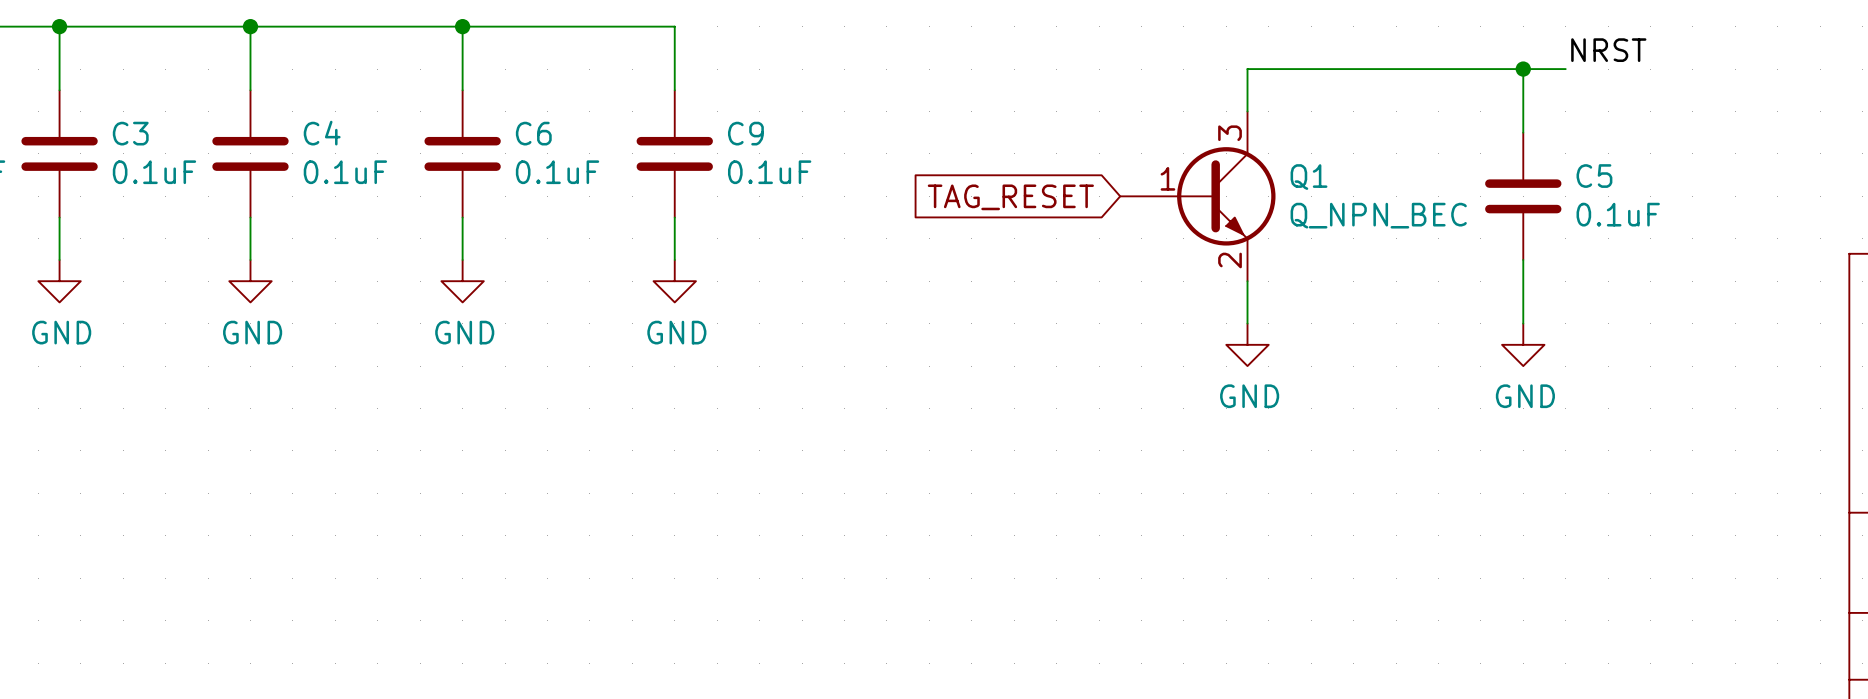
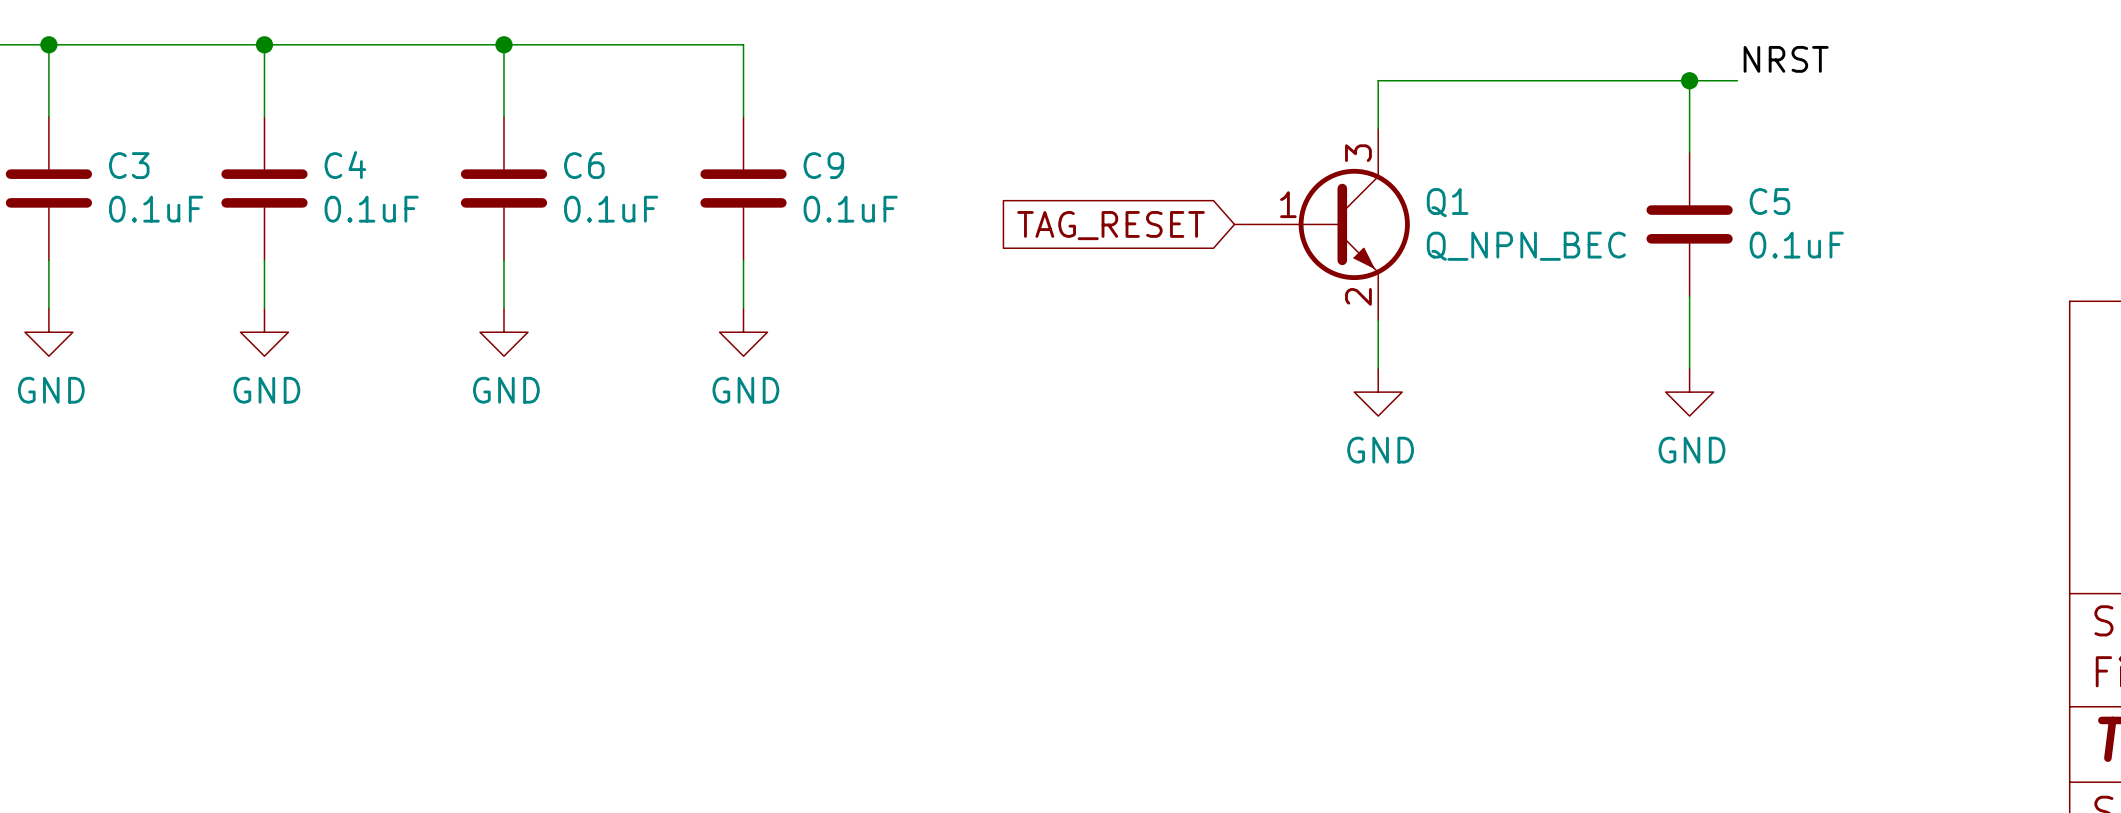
label position: NRST (1608, 50) -> NRST (1786, 59)
wire: (1523, 69) (1523, 132) -> (1689, 80) (1689, 152)
junction position: (1523, 69) -> (1689, 80)
wire: (1565, 69) (1247, 69) (1247, 111) -> (1737, 80) (1378, 80) (1378, 128)
Q1 position: (1197, 196) -> (1322, 224)
C5 position: (1523, 196) -> (1689, 224)
global label position: TAG_RESET (1010, 197) -> TAG_RESET (1111, 225)
wire: (1523, 259) (1523, 323) -> (1689, 296) (1689, 368)
wire: (1247, 281) (1247, 323) -> (1378, 320) (1378, 368)
power symbol position: GND (1247, 344) -> GND (1378, 392)
power symbol position: GND (1523, 344) -> GND (1689, 392)

